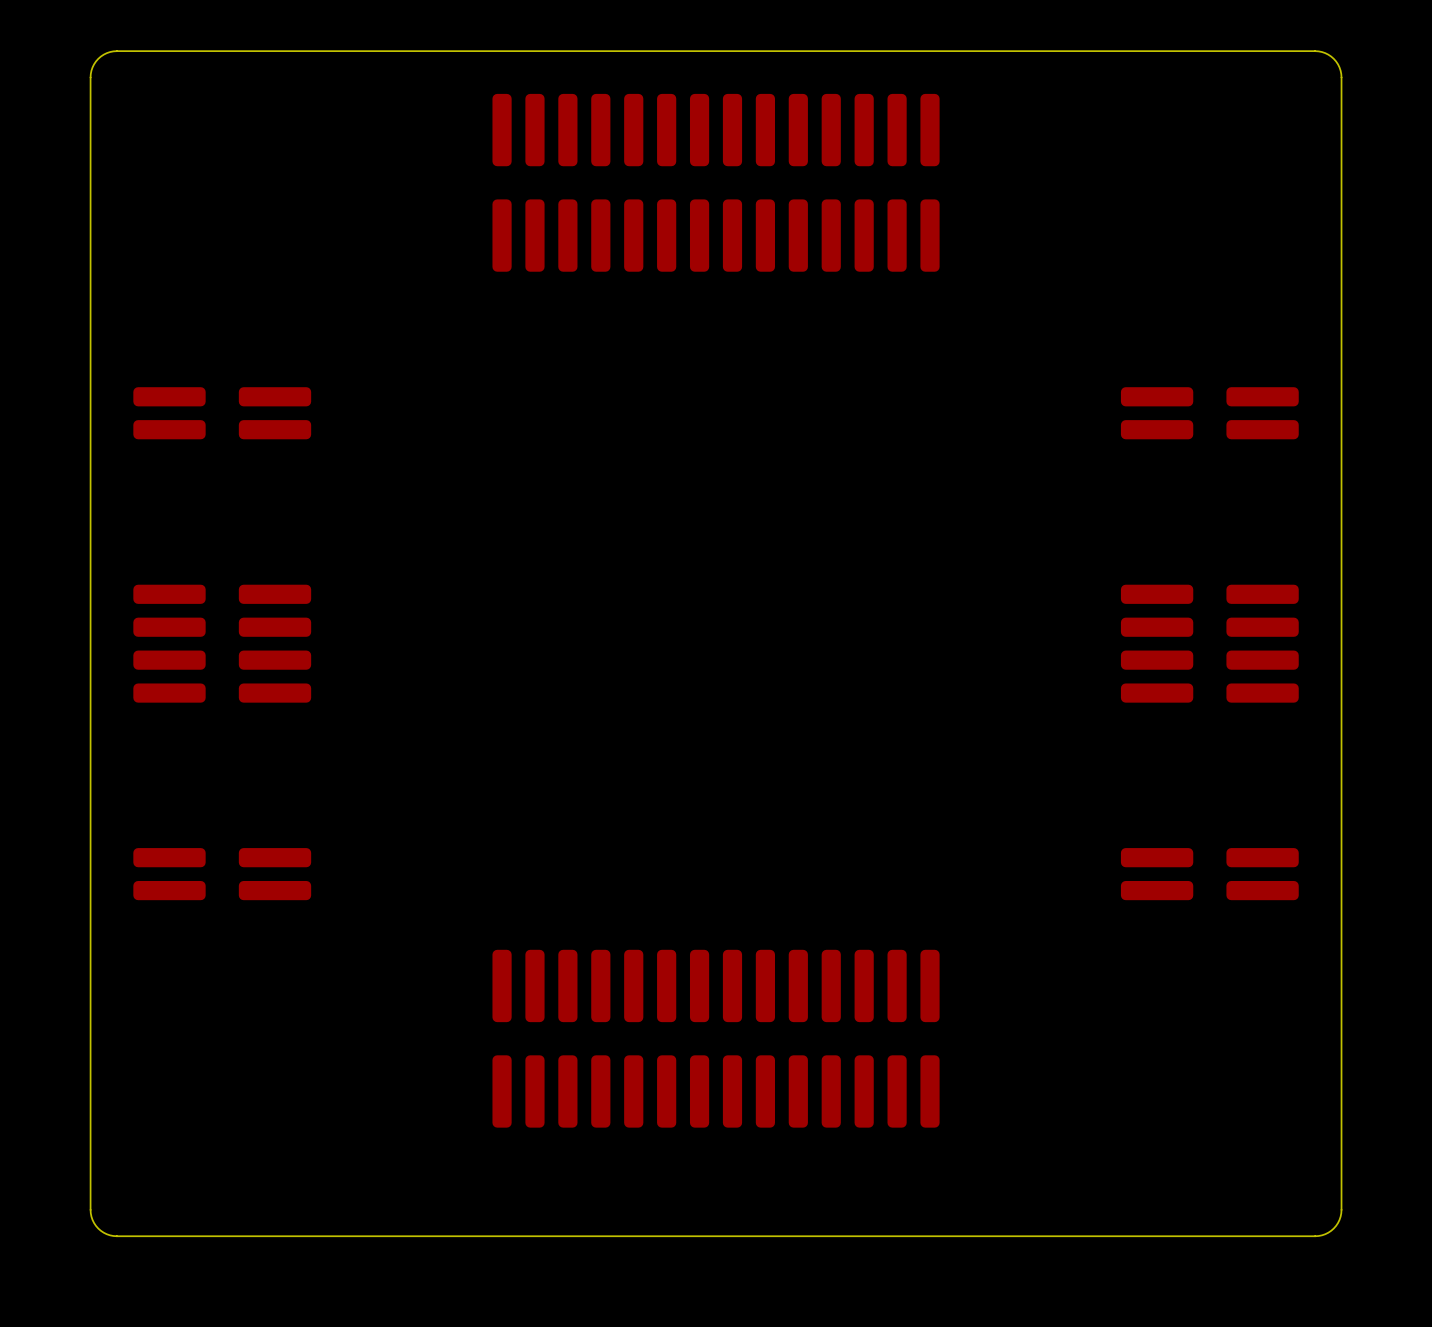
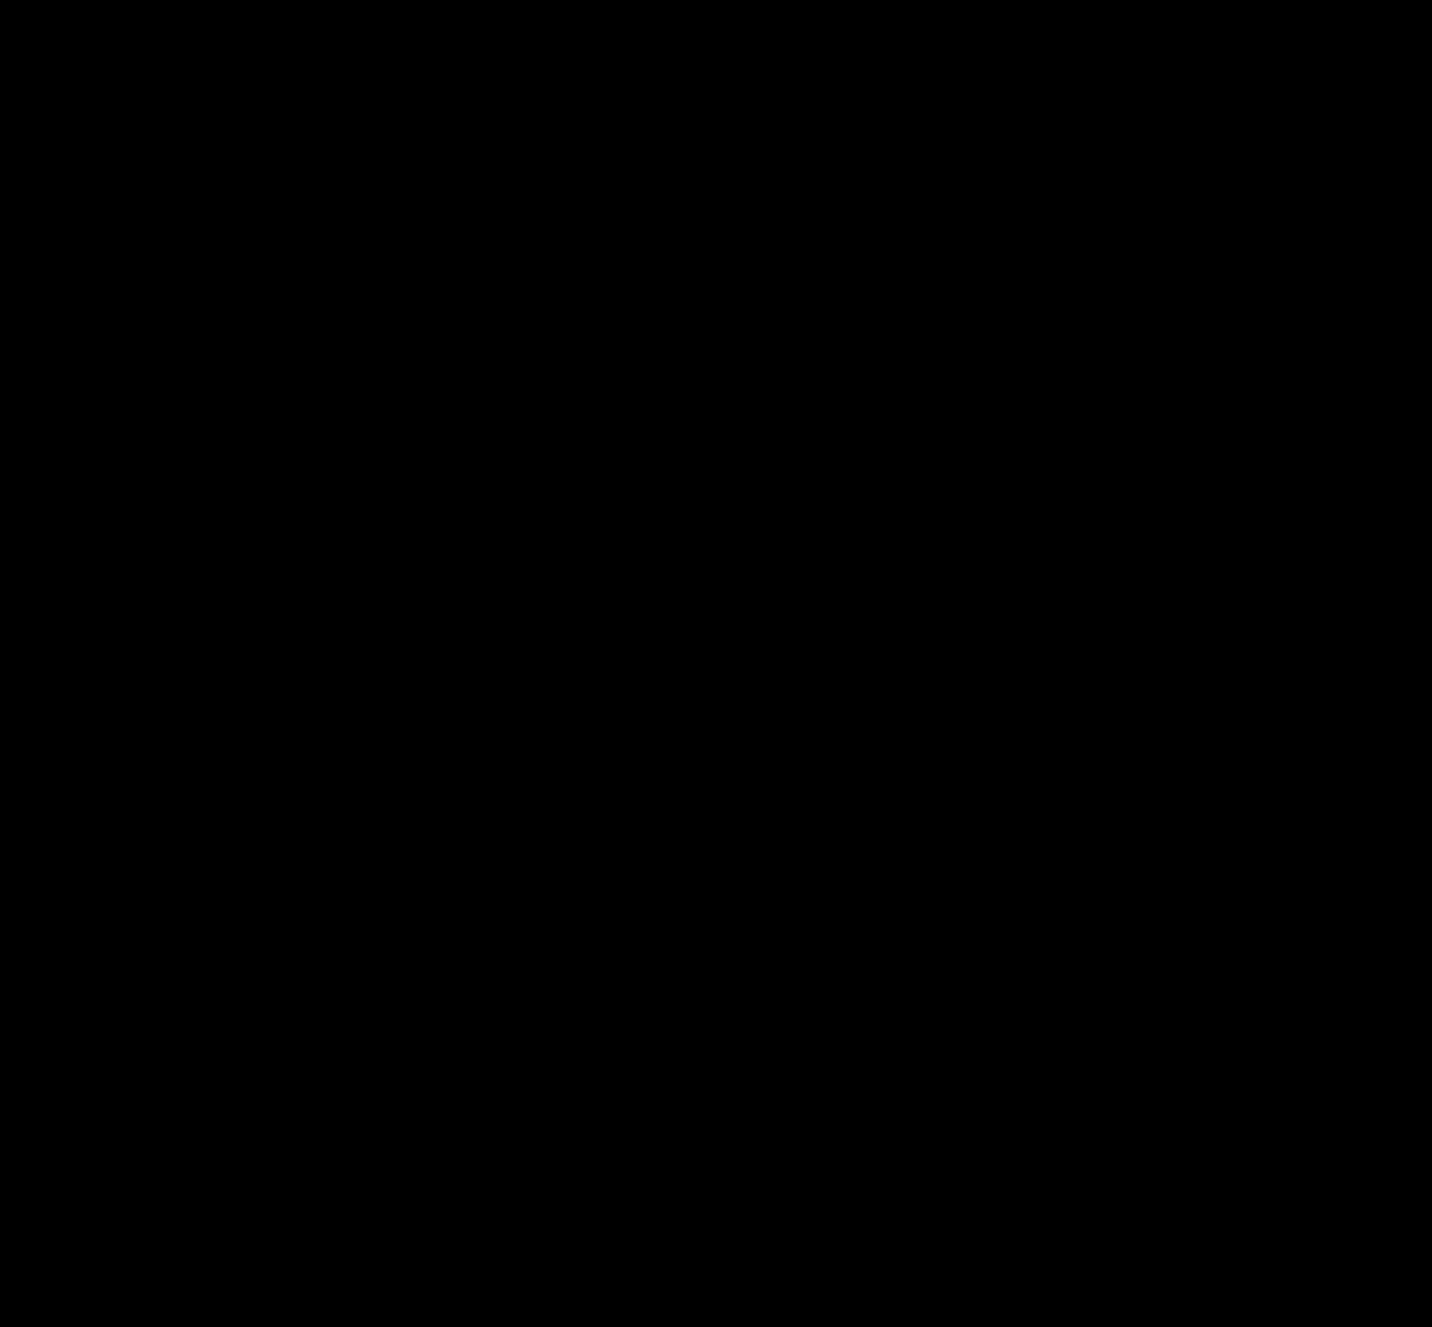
board edge: (1315, 51) (116, 51) (106, 53) (98, 58) (92, 67) (90, 77) (90, 1209) (92, 1219) (98, 1228) (106, 1234) (116, 1236) (1315, 1236) (1325, 1234) (1333, 1228) (1339, 1219) (1341, 1209) (1341, 77) (1339, 67) (1333, 58) (1325, 53) (1315, 51) -> none
part: (716, 182) -> none
part: (222, 413) -> none
part: (1209, 413) -> none
part: (222, 643) -> none
part: (1209, 643) -> none
part: (222, 874) -> none
part: (1209, 874) -> none
part: (716, 1038) -> none

